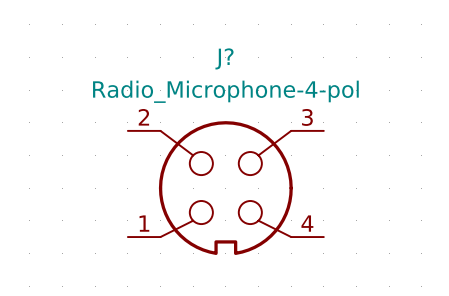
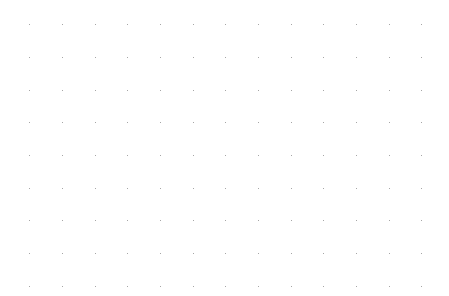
J?: Radio_Microphone-4-pol (225, 188) -> none

